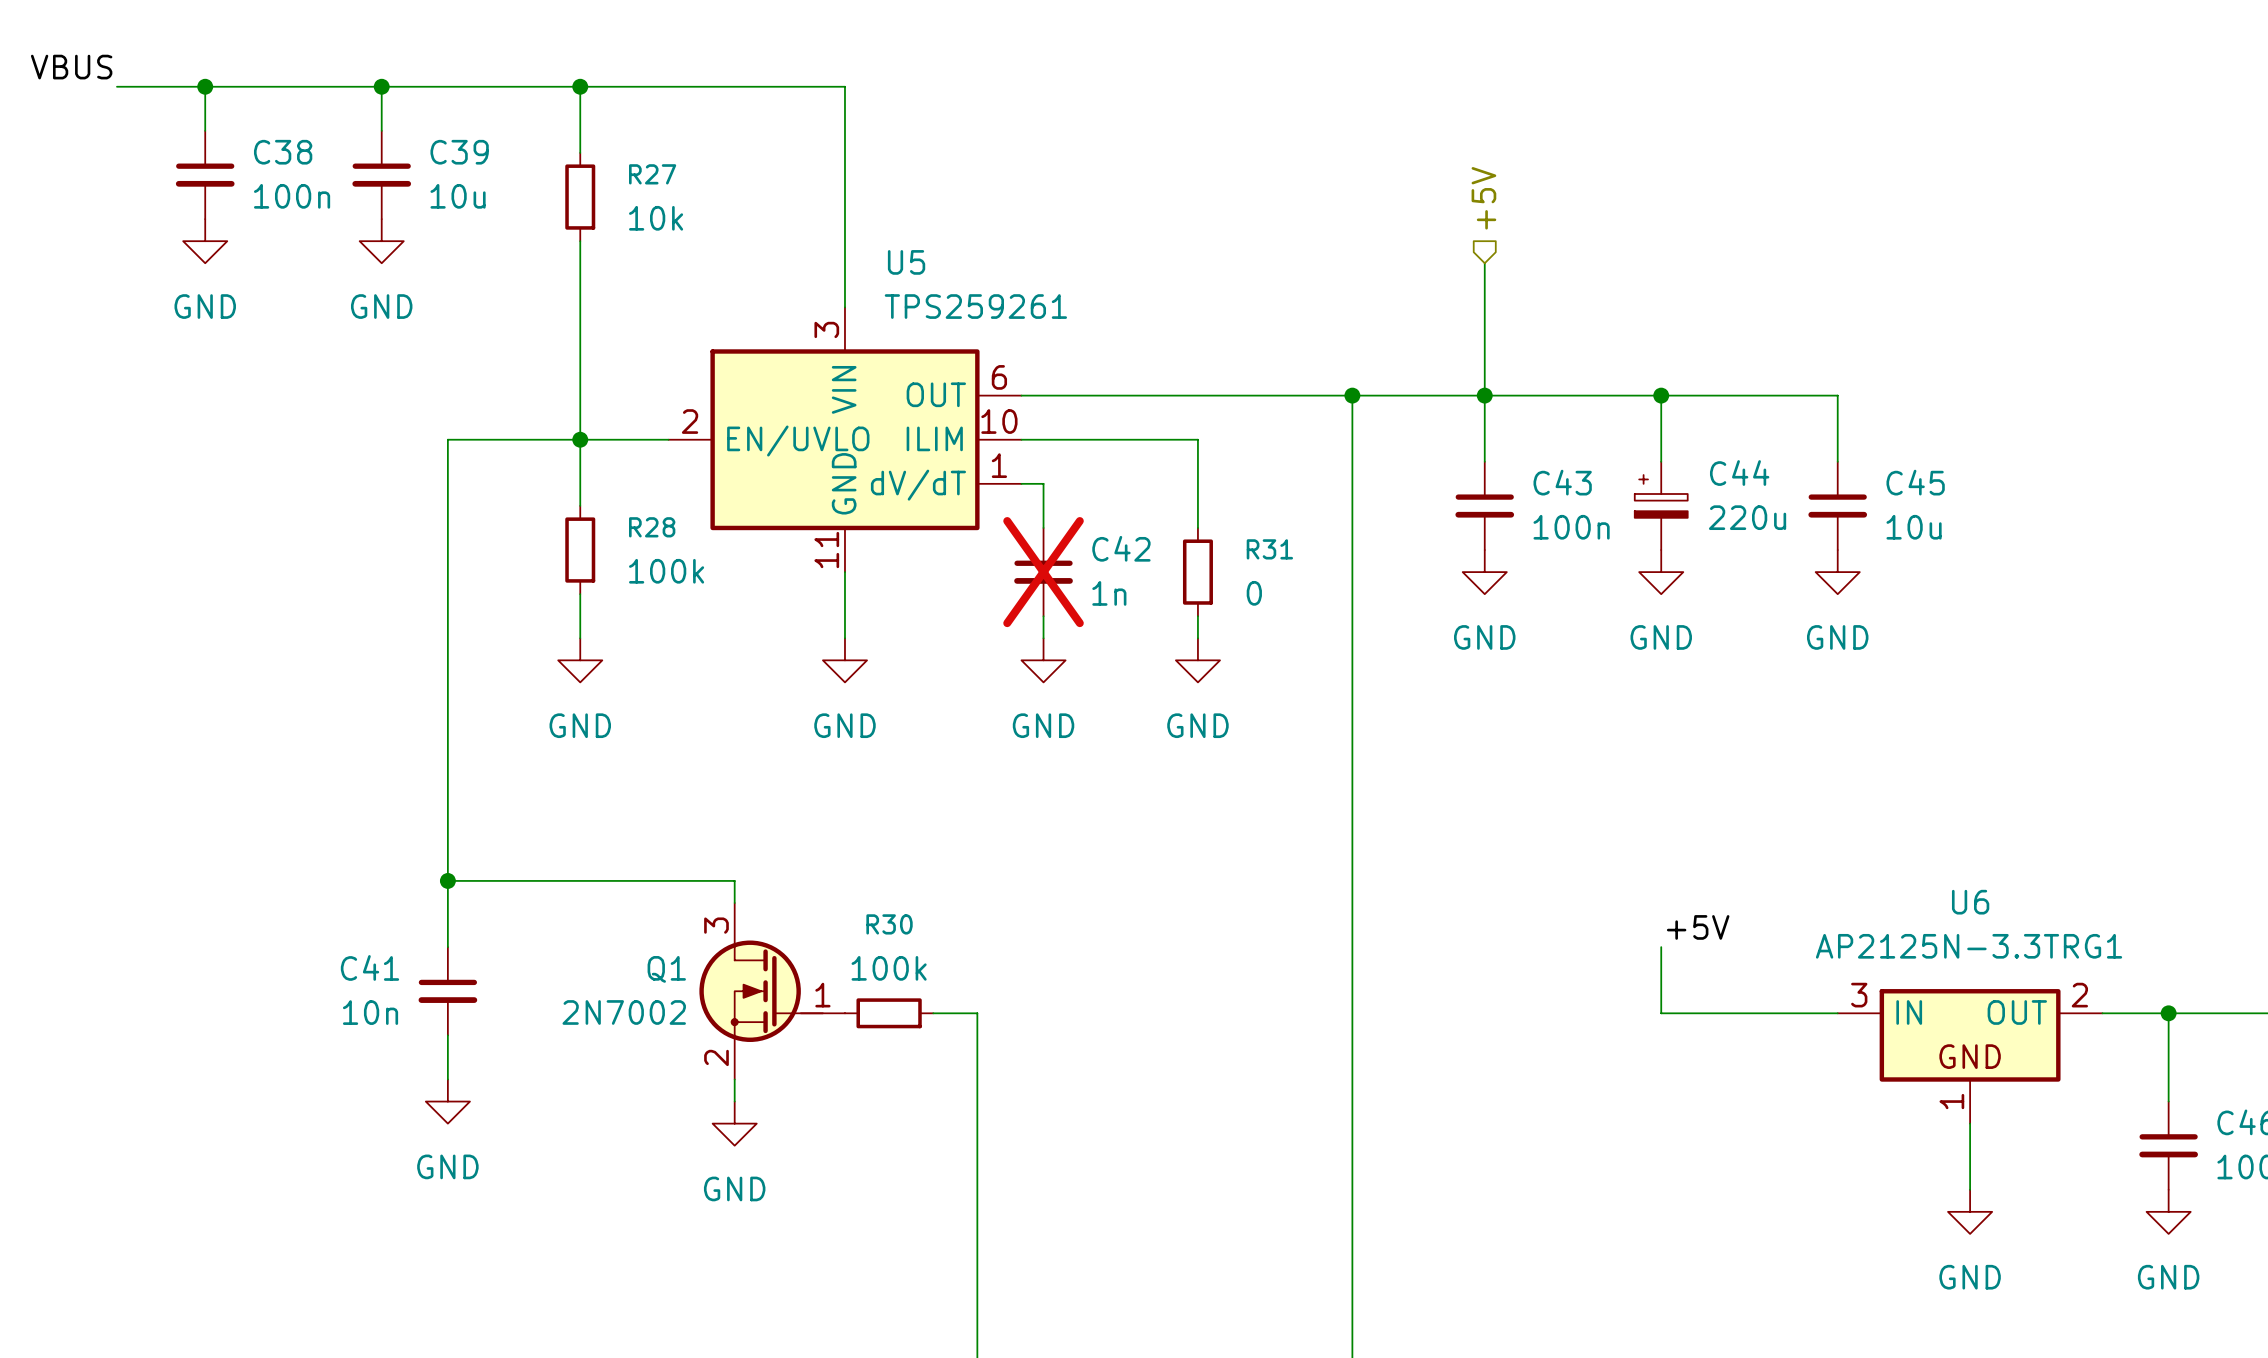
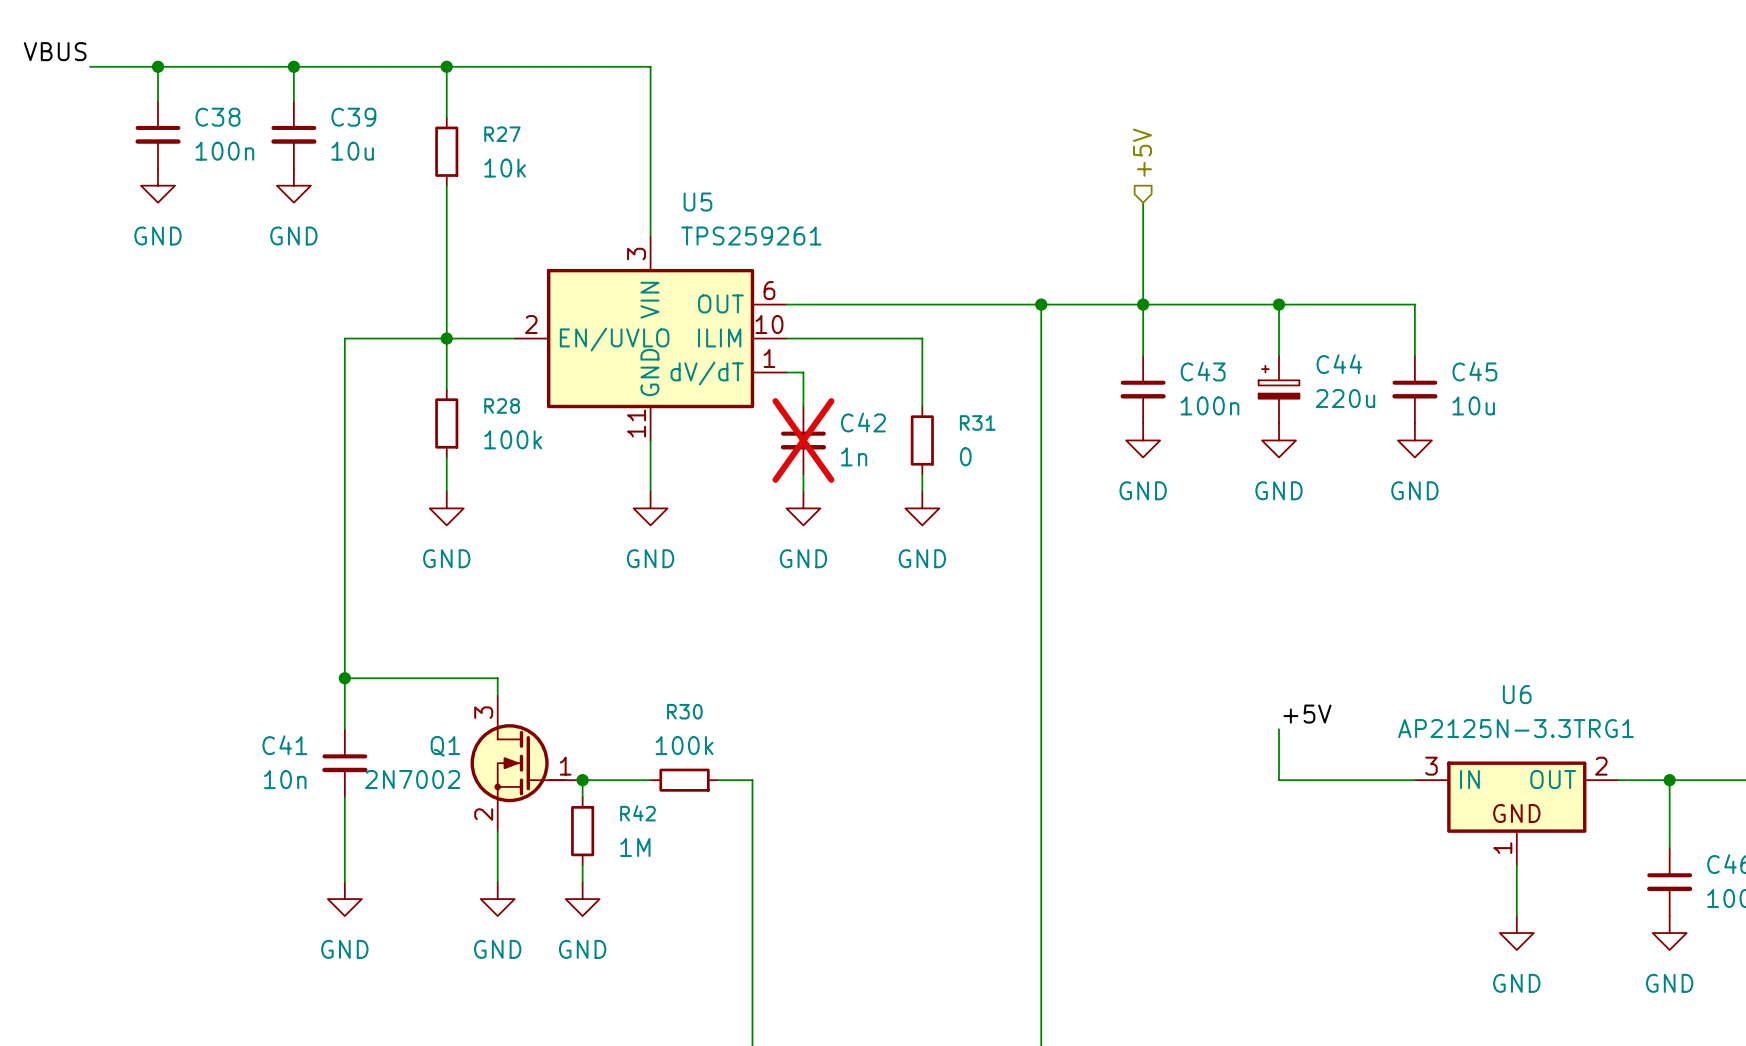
wire: (646, 880) (734, 880) (734, 903) -> (497, 678) (497, 695)
Q1 position: (772, 991) -> (526, 763)
junction: none -> (582, 780)
wire: none -> (344, 831) (344, 882)
wire: none -> (497, 831) (497, 882)
wire: (734, 1079) (734, 1101) -> (582, 865) (582, 882)
R42: none -> 1M (582, 831)
power symbol position: GND (447, 1101) -> GND (344, 899)
power symbol: GND (734, 1123) -> none
power symbol: none -> GND (497, 899)
power symbol: none -> GND (582, 899)

